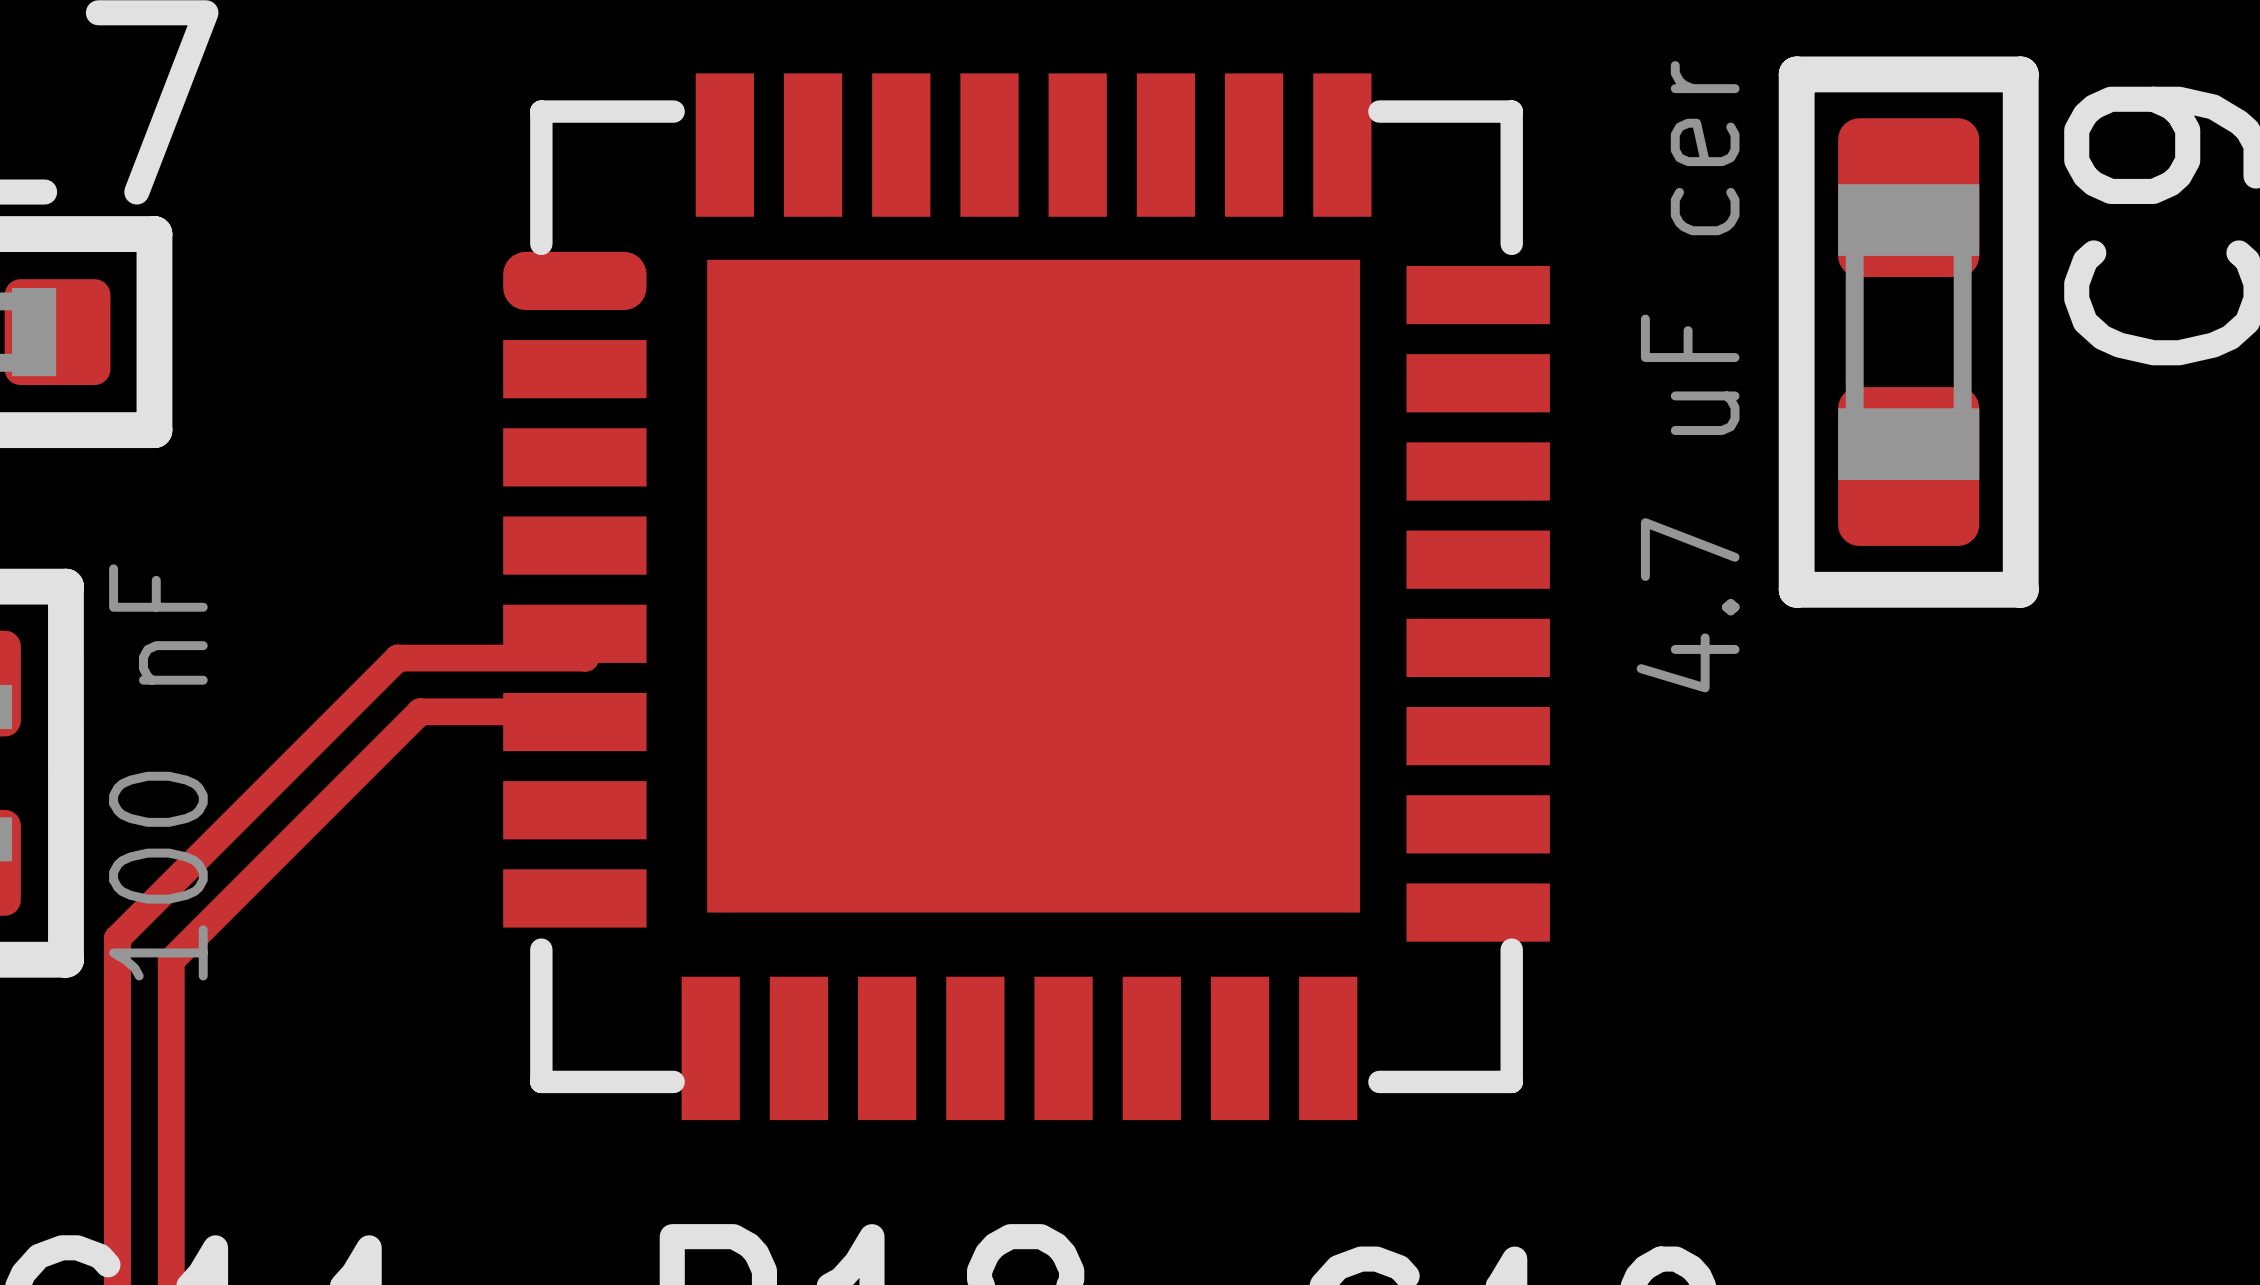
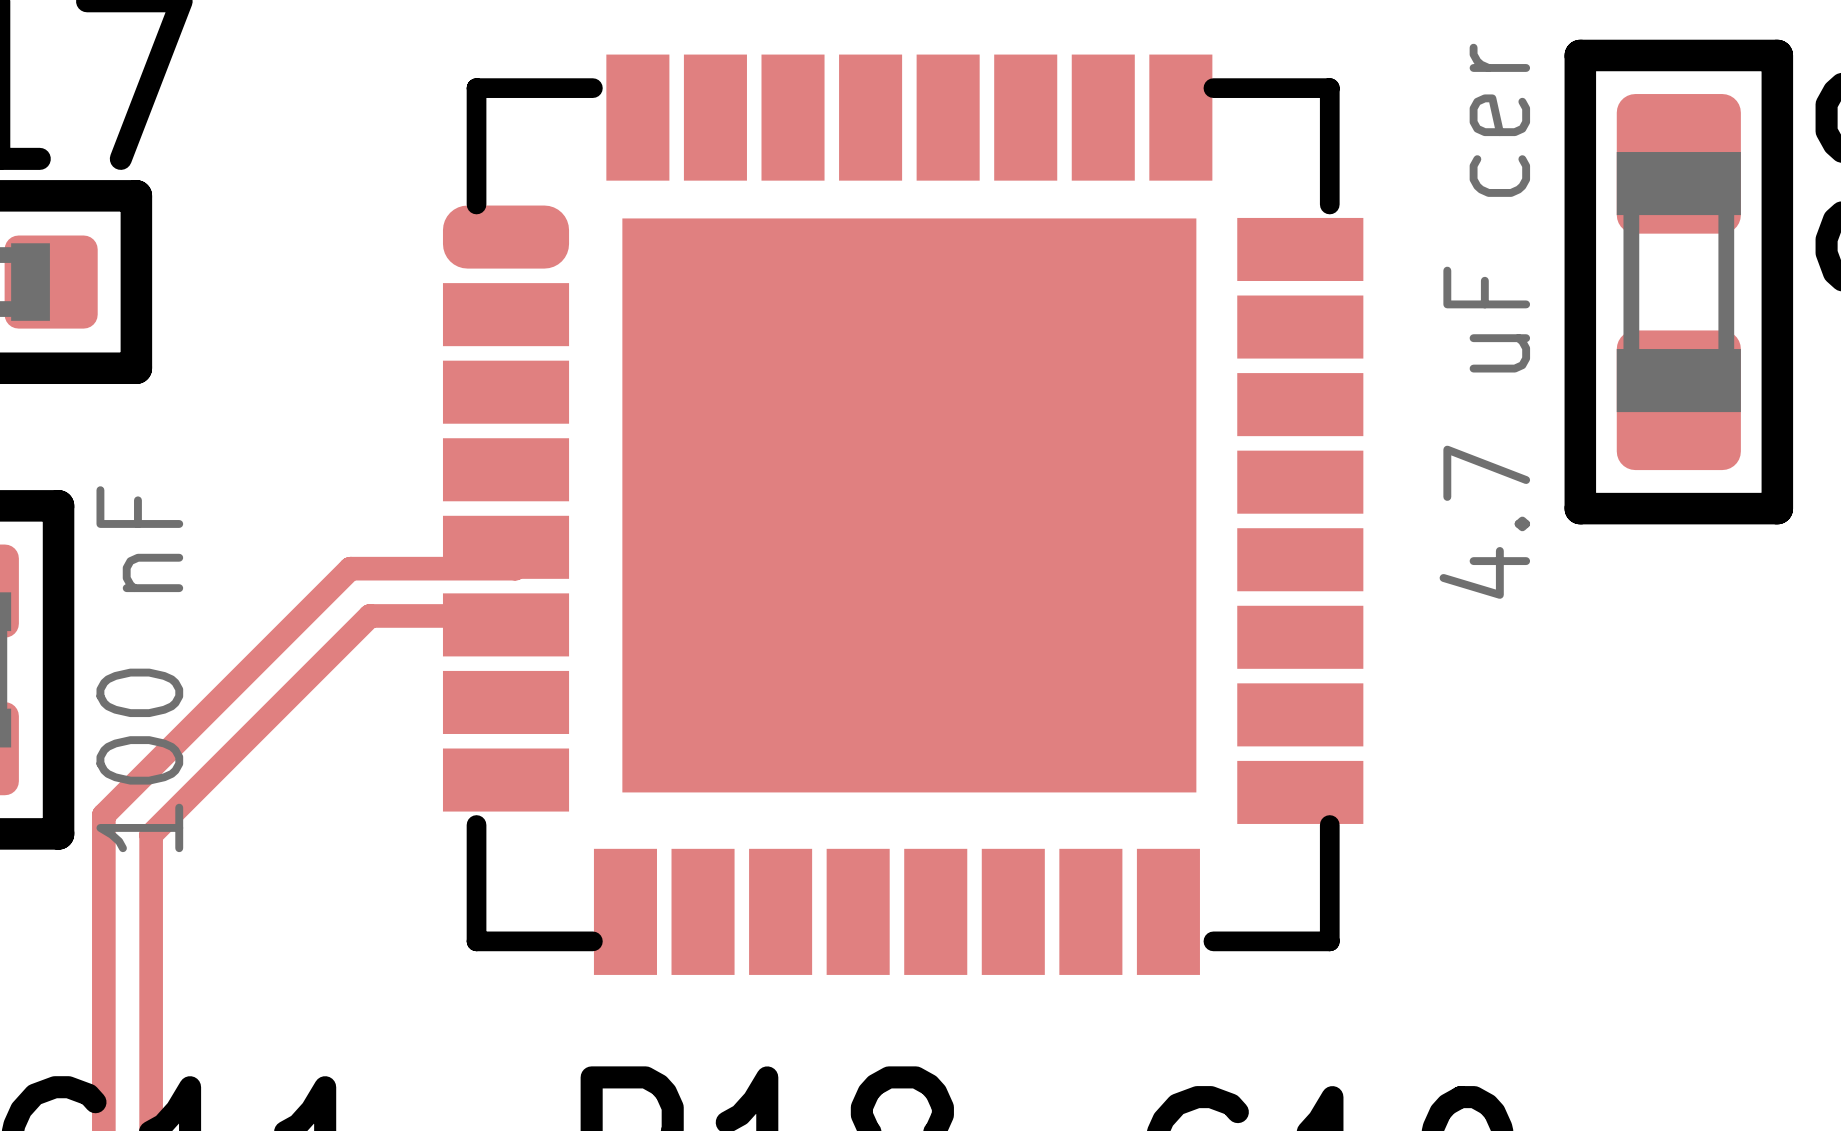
part footprint: [503, 73, 1550, 1121] -> [442, 54, 1364, 975]

